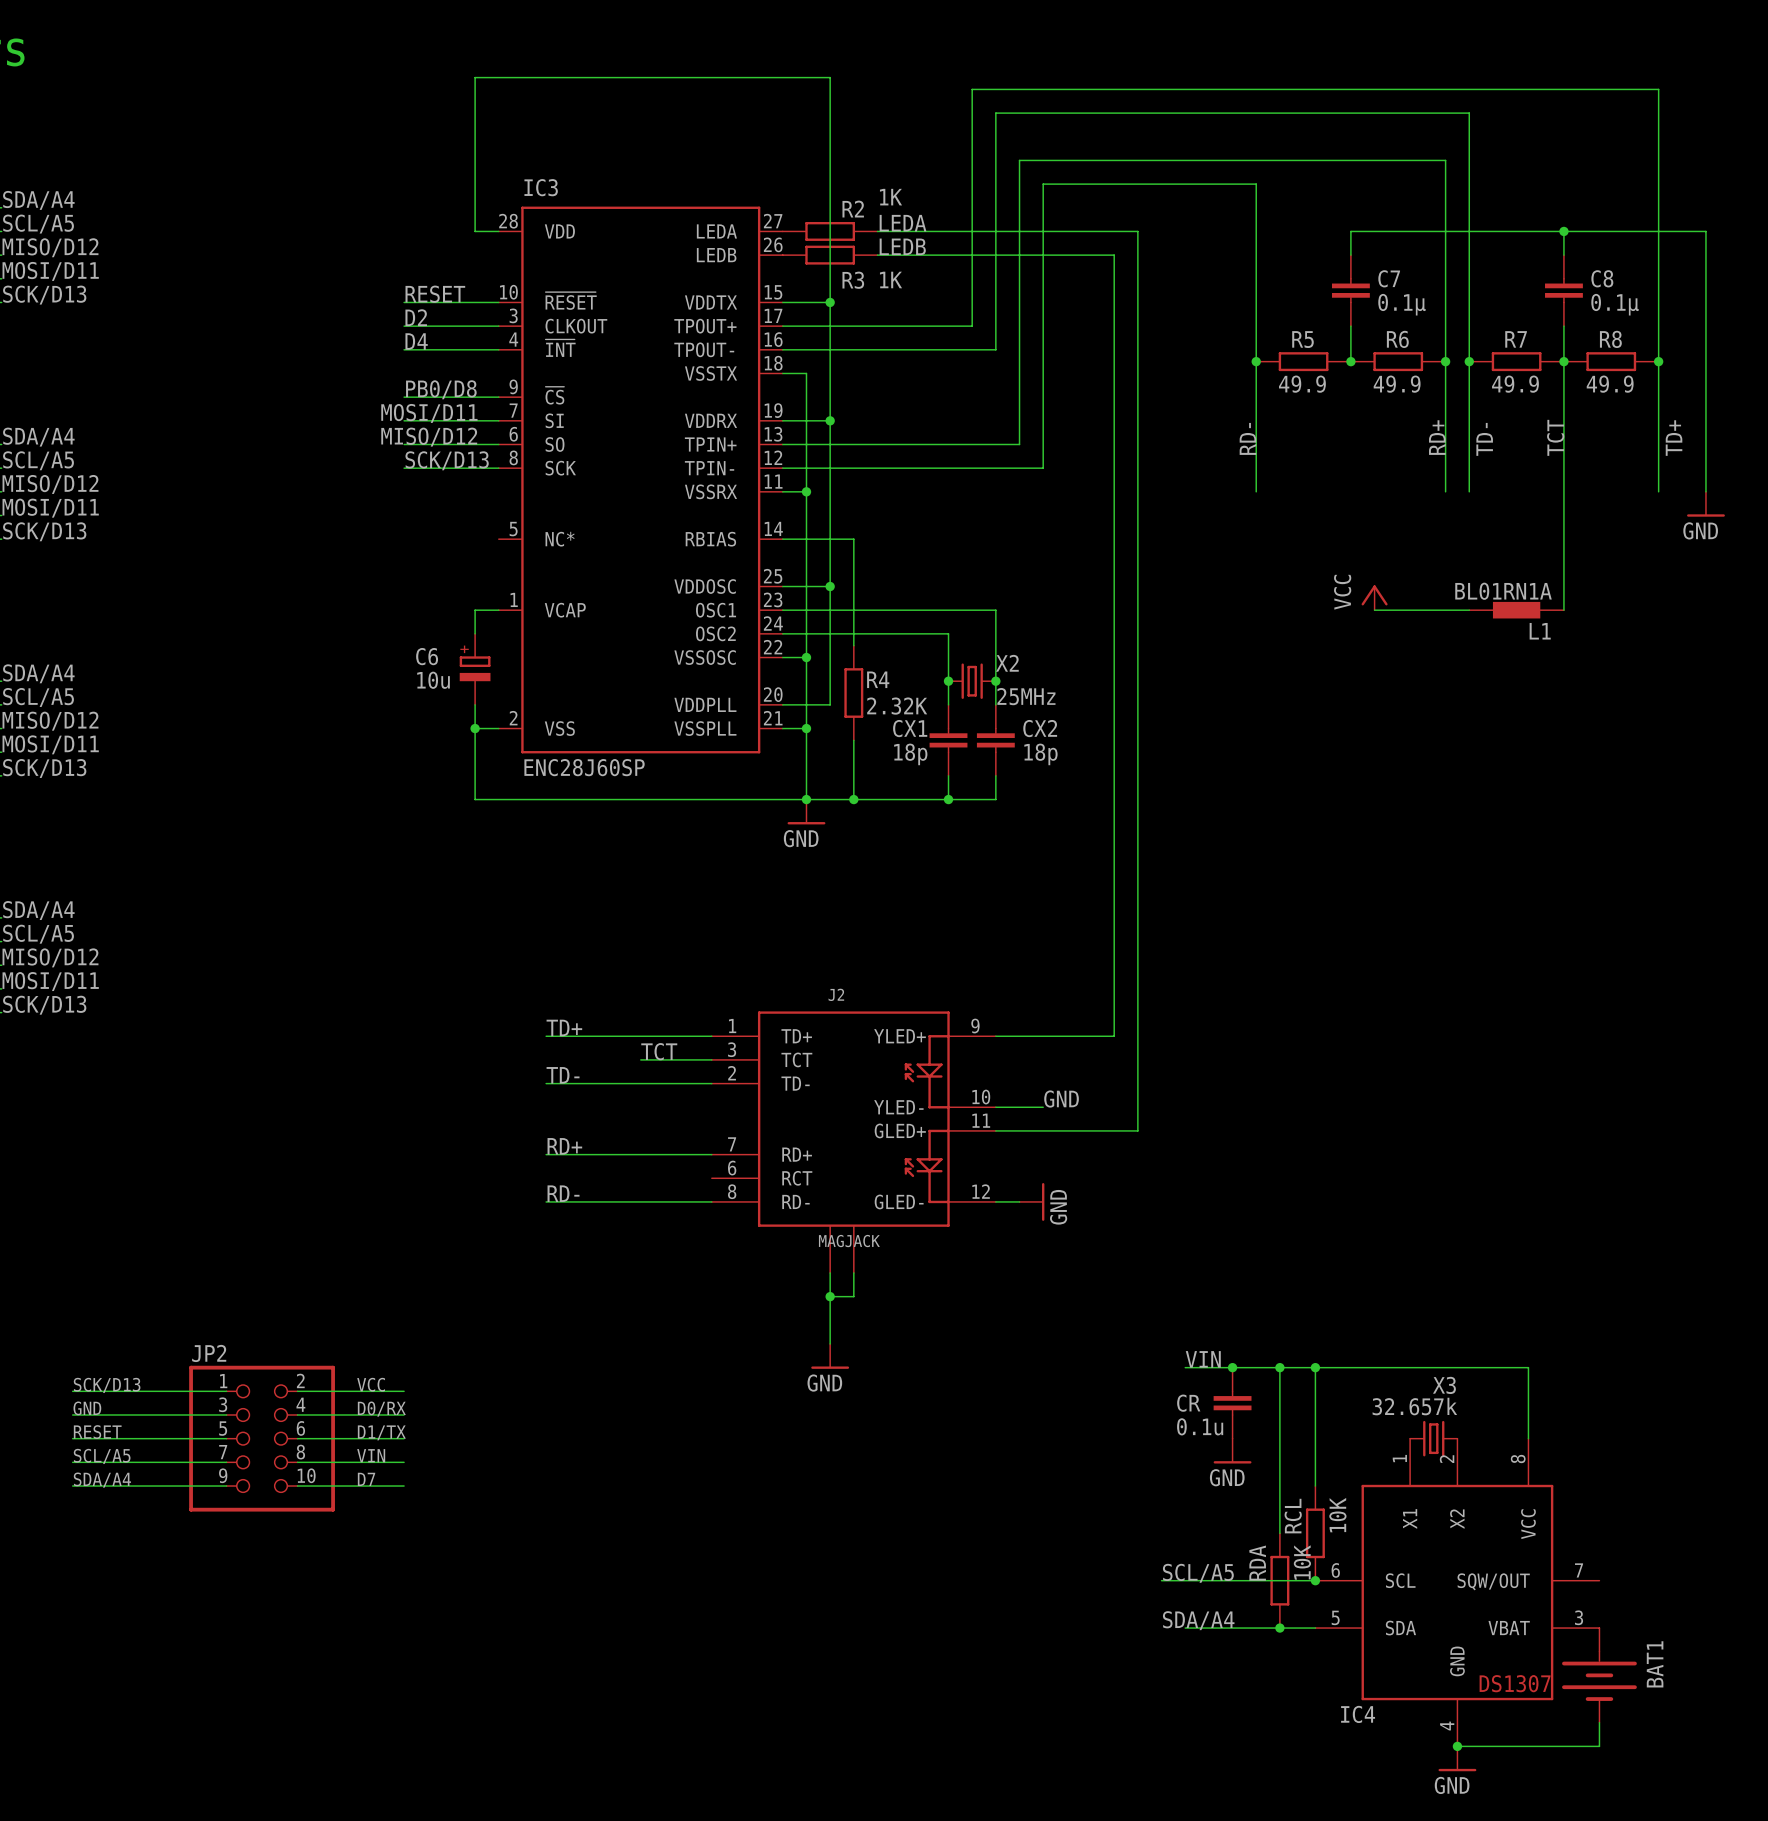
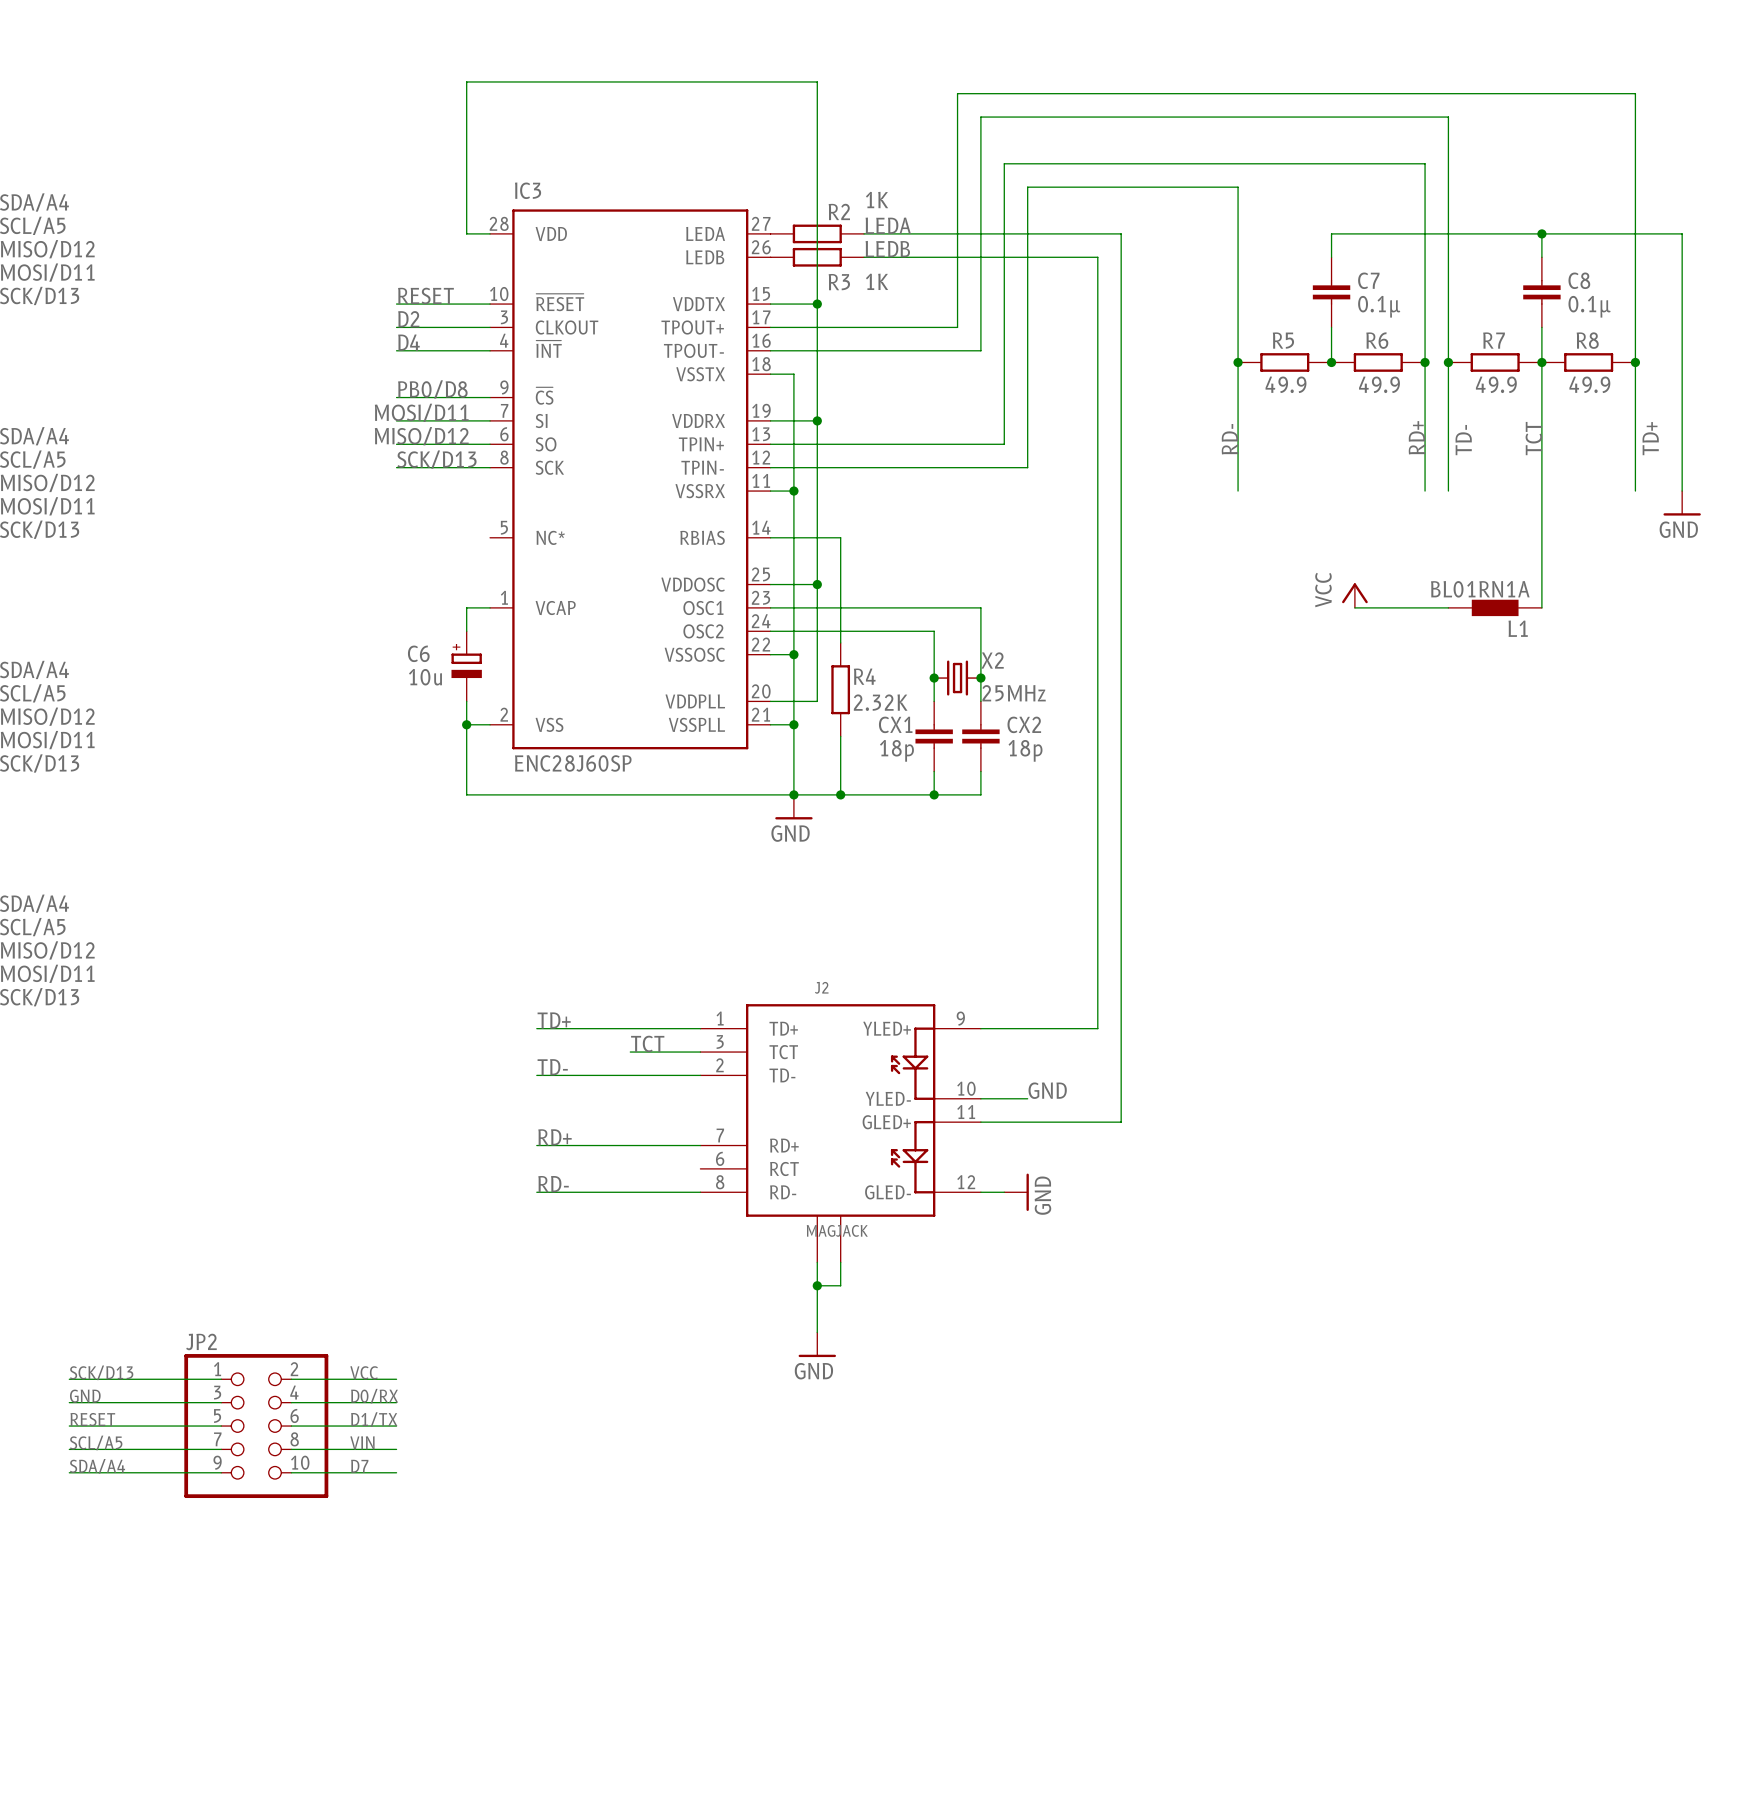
label: VIN (1203, 1359) -> none
wire: (1185, 1367) (1528, 1367) (1528, 1438) -> none
junction: (1232, 1367) -> none
wire: (1279, 1367) (1279, 1533) -> none
junction: (1279, 1367) -> none
wire: (1315, 1367) (1315, 1486) -> none
junction: (1315, 1367) -> none
CR: 0.1u (1232, 1403) -> none
X3: 32.657k (1433, 1438) -> none
power symbol: GND (1232, 1451) -> none
RCL: 10K (1315, 1533) -> none
label: SCL/A5 (1198, 1573) -> none
wire: (1161, 1580) (1315, 1580) -> none
RDA: 10K (1279, 1580) -> none
junction: (1315, 1580) -> none
IC4: (1457, 1592) -> none
label: SDA/A4 (1198, 1620) -> none
wire: (1185, 1628) (1315, 1628) -> none
junction: (1279, 1628) -> none
BAT1: (1599, 1675) -> none
wire: (1599, 1722) (1599, 1746) (1457, 1746) -> none
junction: (1457, 1746) -> none
power symbol: GND (1457, 1758) -> none

